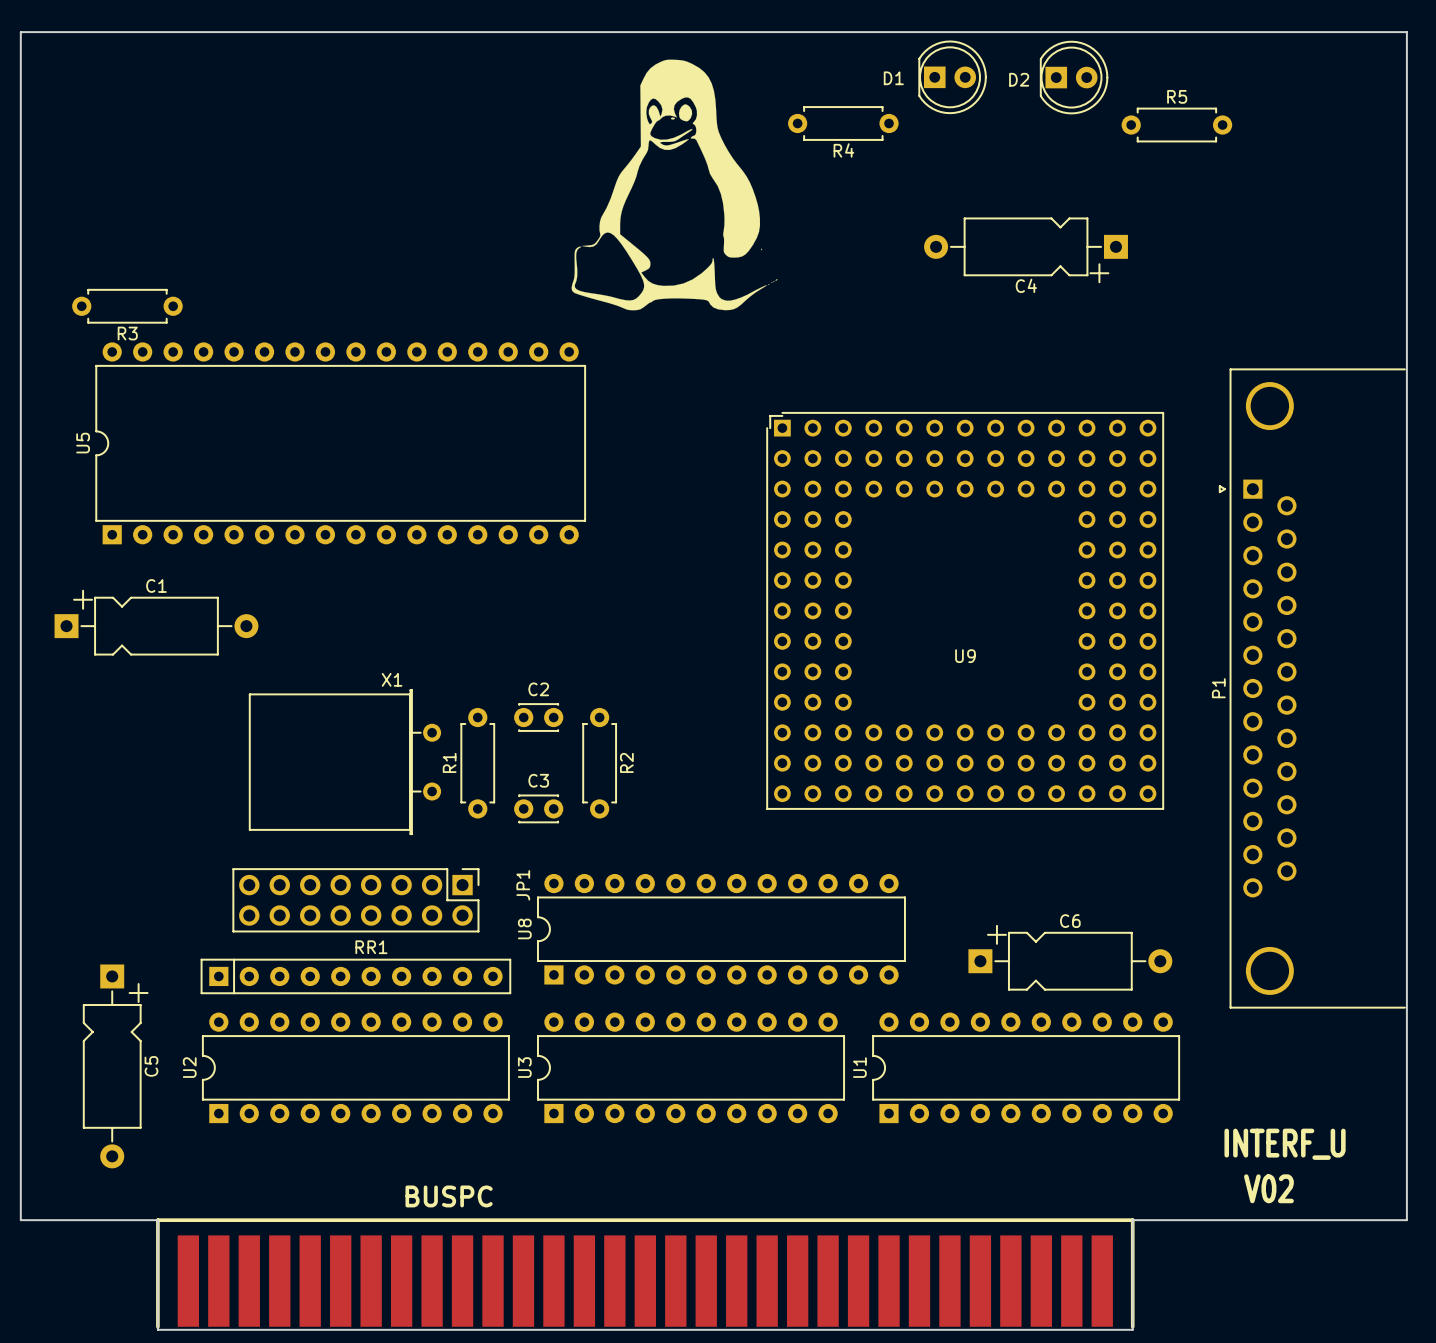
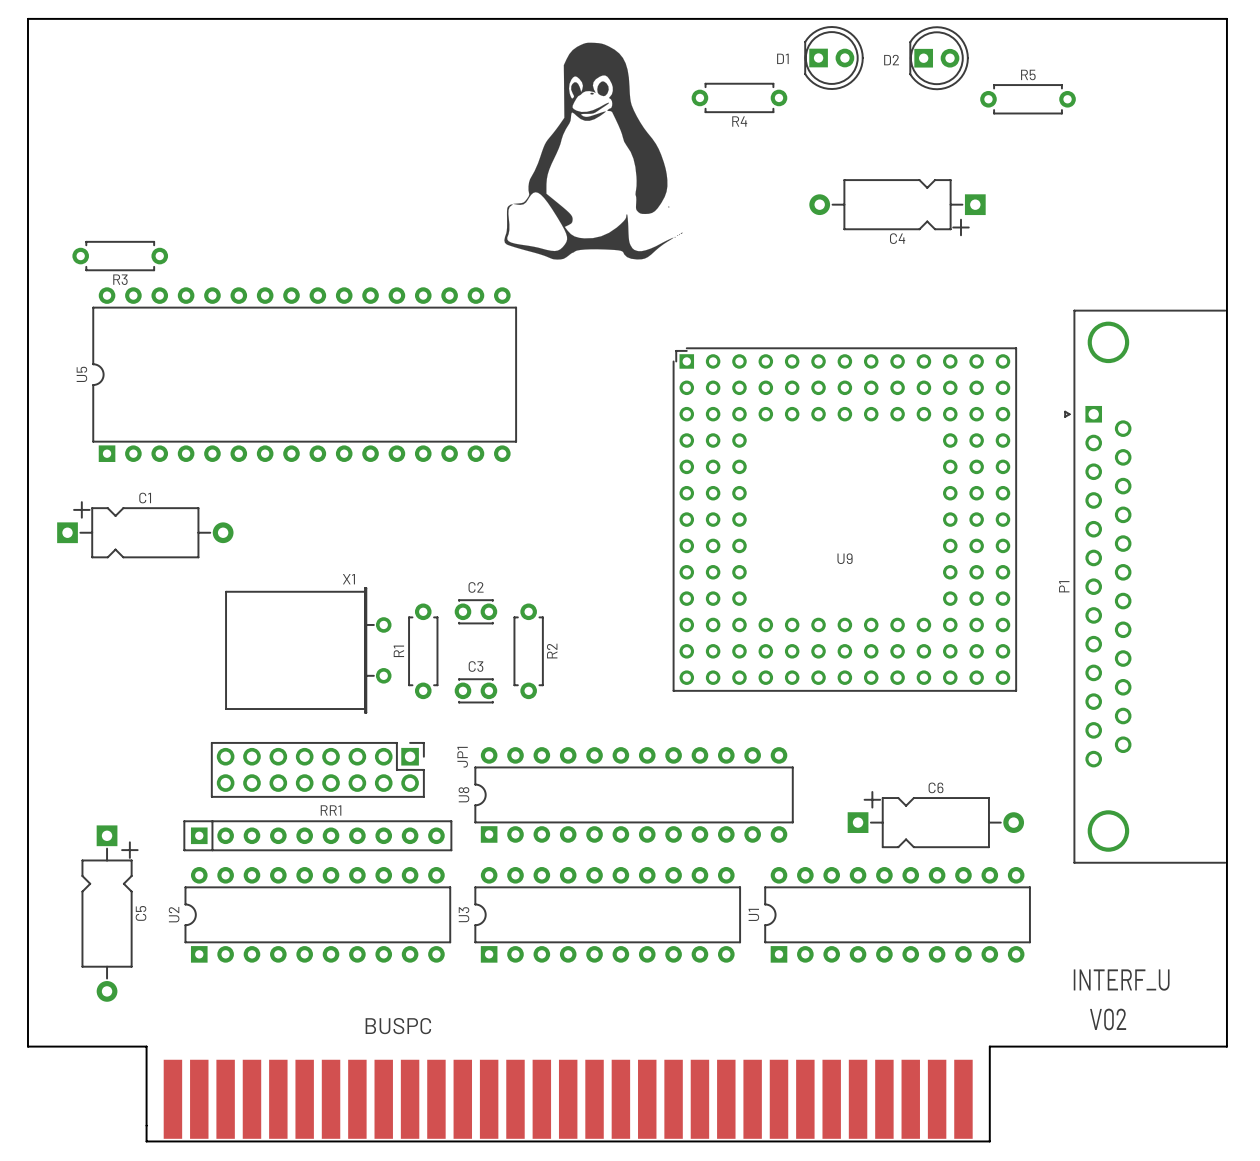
part footprint: [156, 1218, 1135, 1329] -> [163, 1059, 973, 1139]

